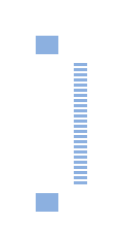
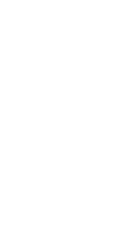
part: (61, 123) -> none

